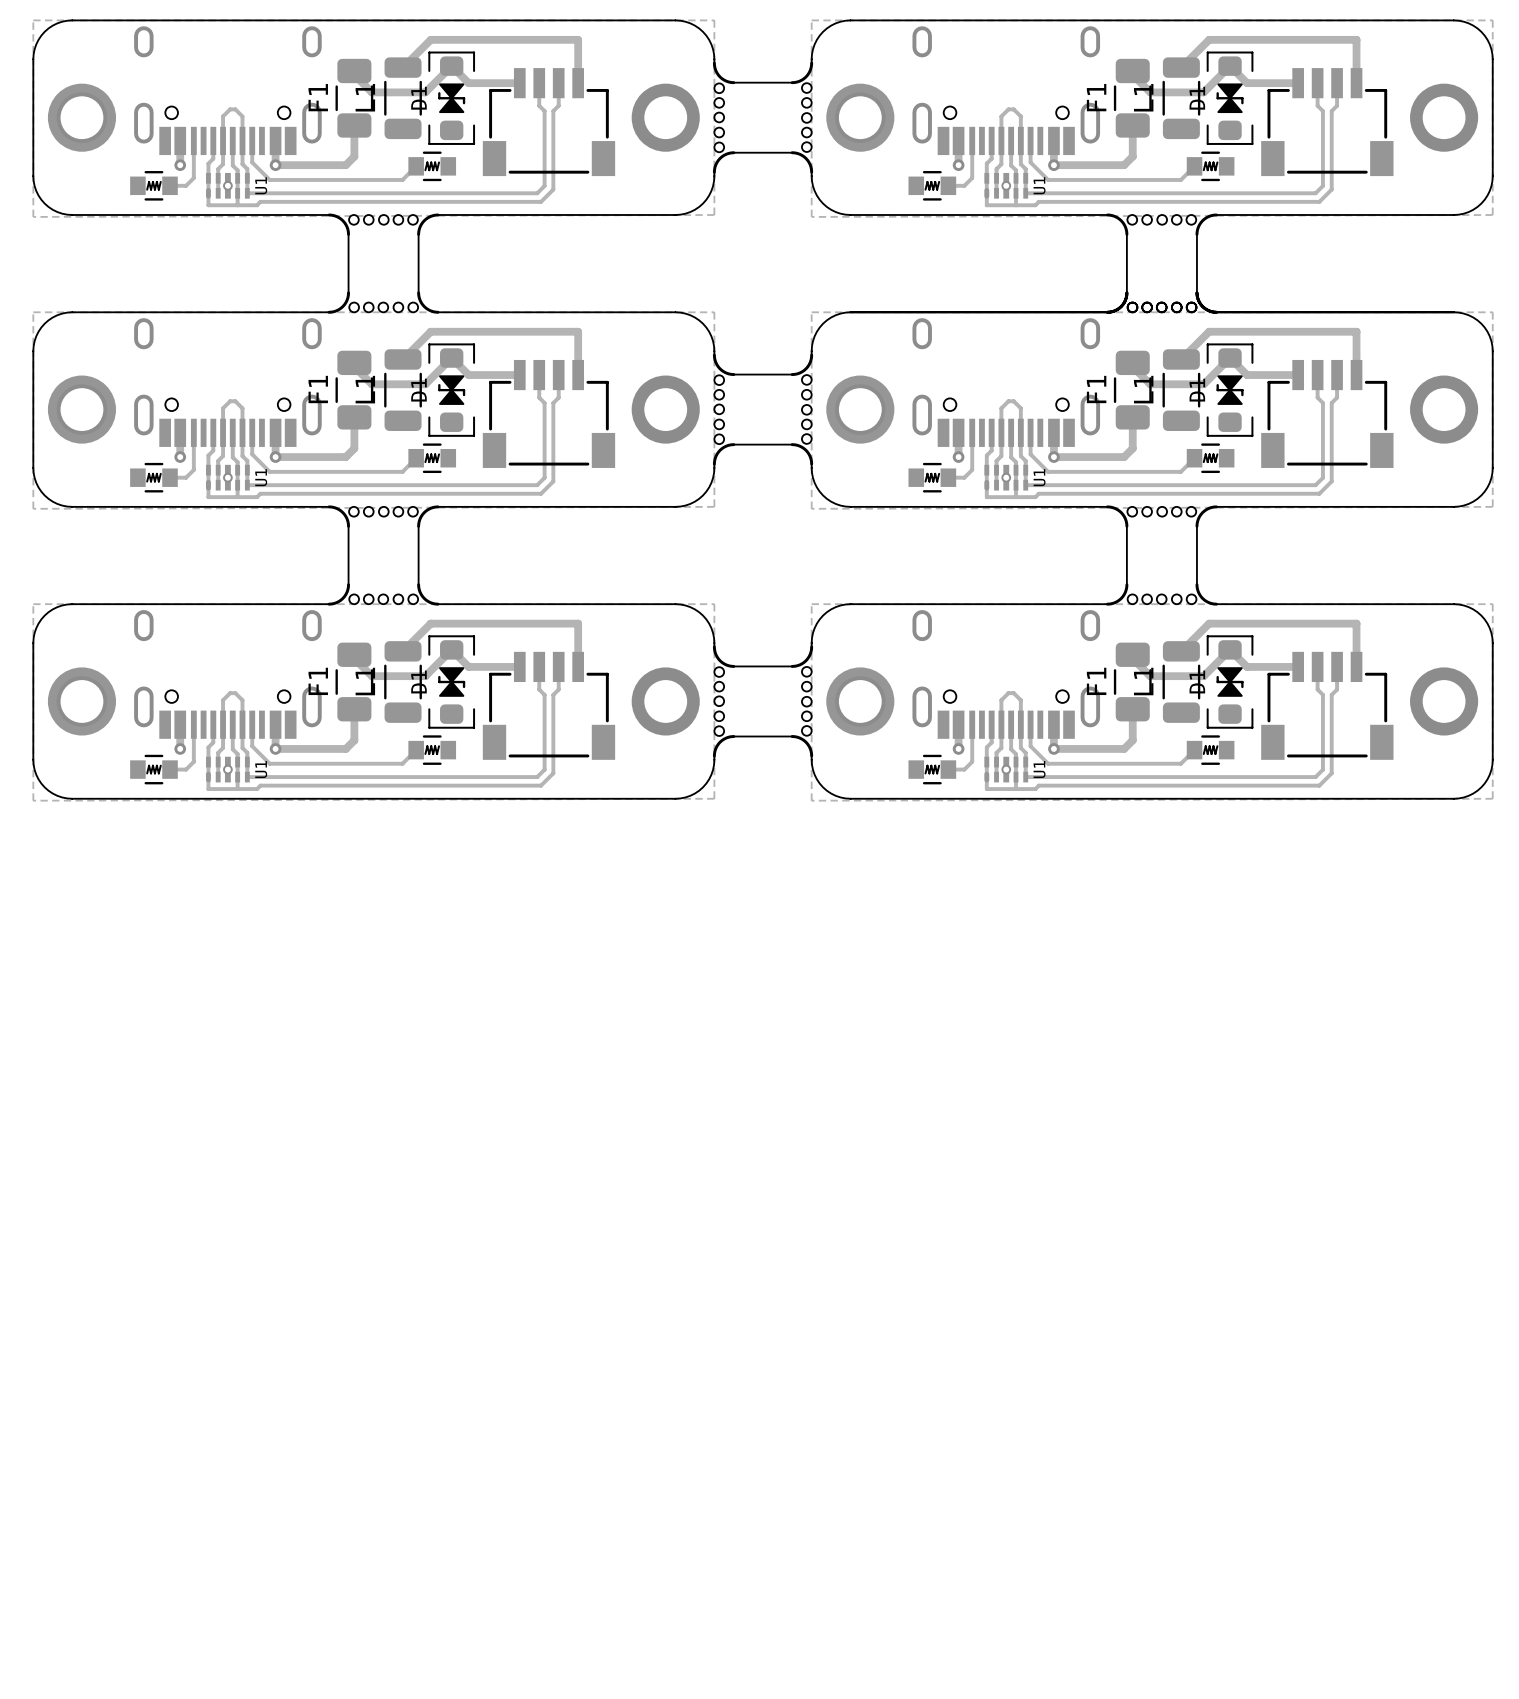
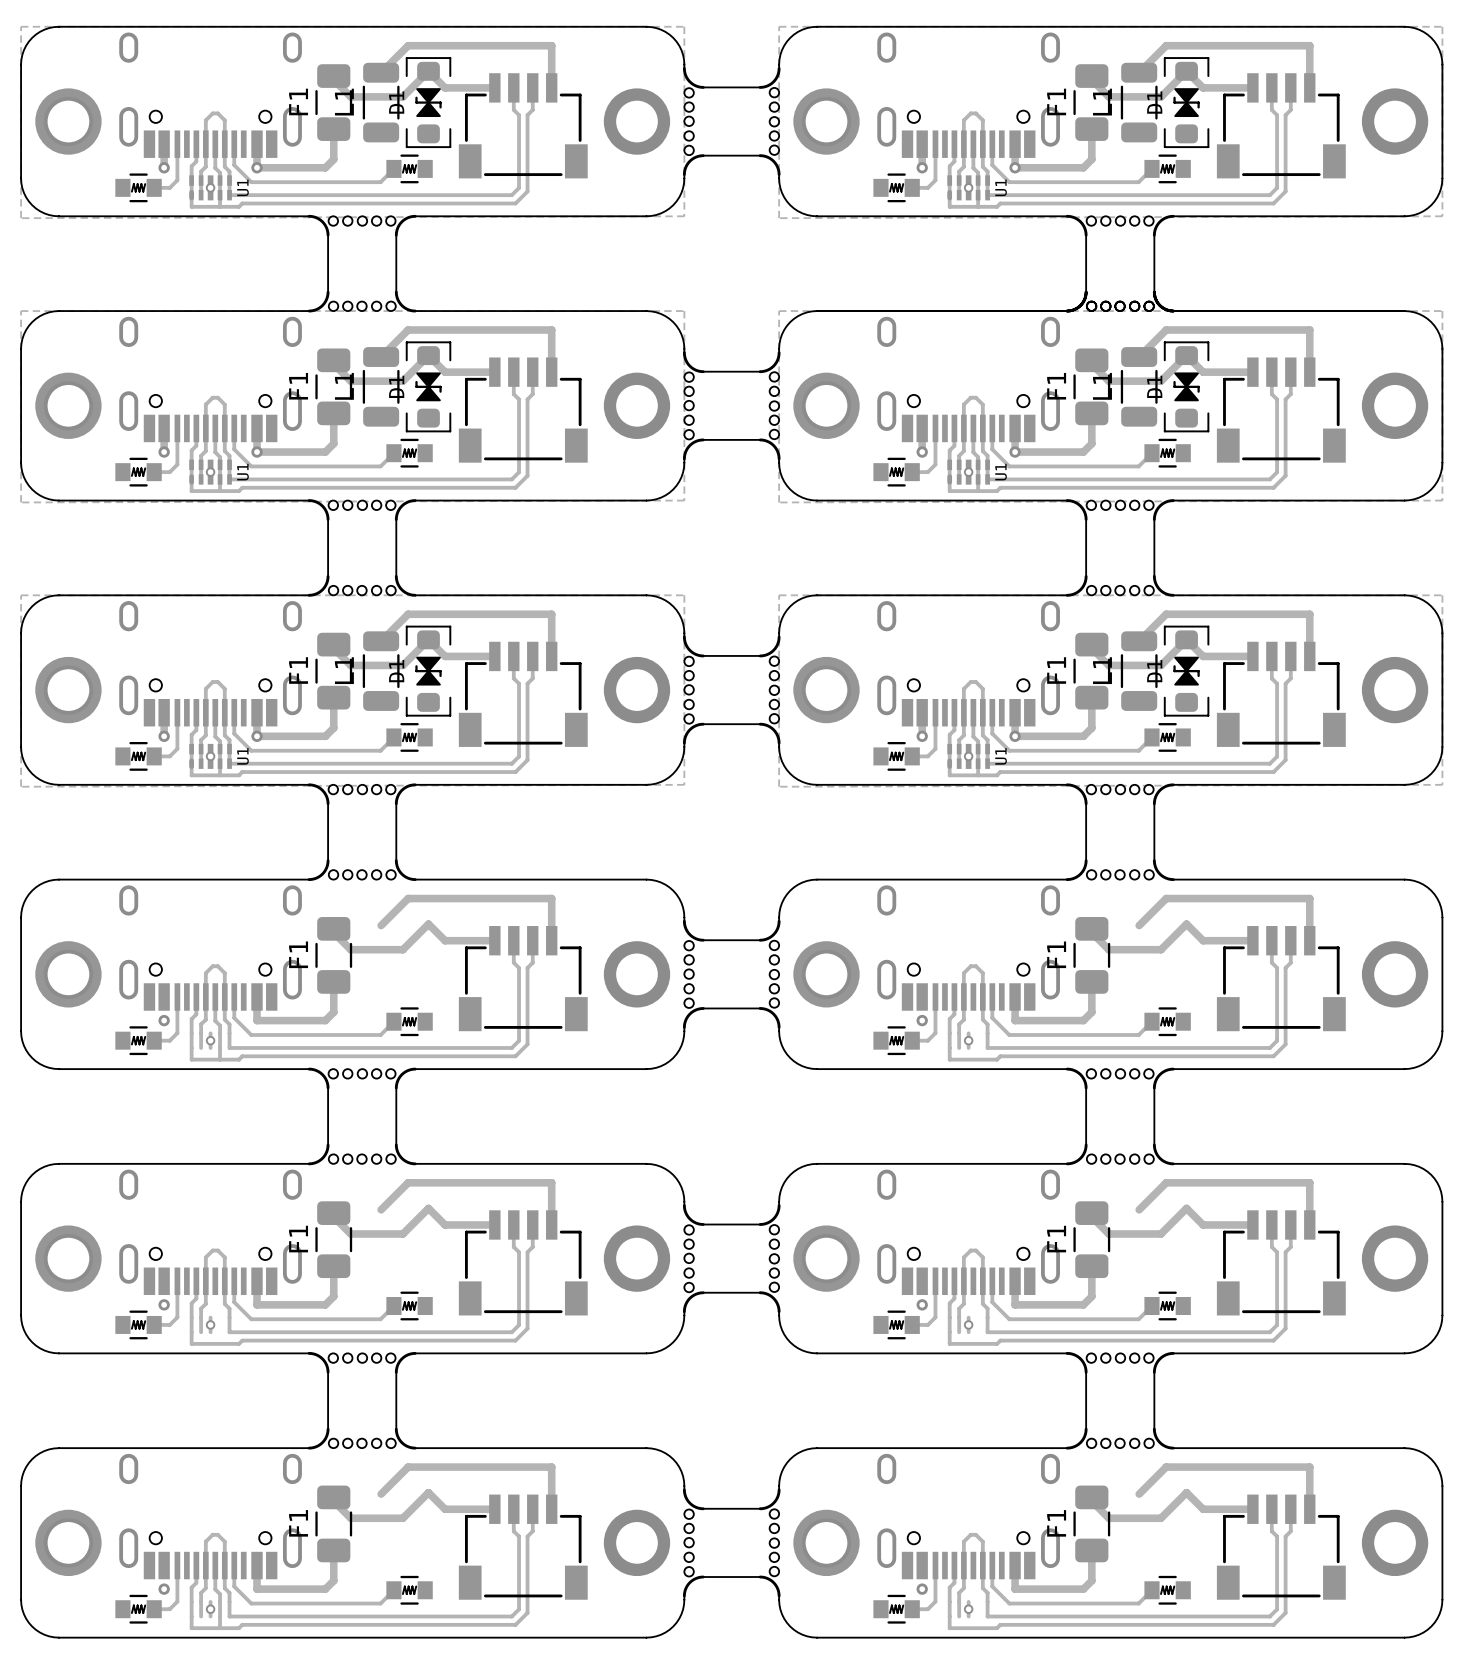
board edge: (329, 798) (438, 798) -> none
board edge: (1107, 798) (1216, 798) -> none
part: none -> (362, 794)
part: none -> (1120, 794)
board edge: none -> (328, 803) (328, 860)
board edge: none -> (396, 803) (396, 860)
board edge: none -> (1086, 803) (1086, 860)
board edge: none -> (1154, 803) (1154, 860)
part: none -> (362, 870)
part: none -> (1120, 870)
board edge: none -> (309, 879) (54, 879) (40, 884) (28, 894) (23, 902) (21, 917) (21, 1036) (26, 1050) (40, 1064) (58, 1069) (309, 1069)
board edge: none -> (415, 879) (651, 879) (665, 884) (676, 894) (683, 907) (684, 921)
board edge: none -> (1067, 879) (812, 879) (798, 884) (786, 894) (780, 907) (779, 921)
board edge: none -> (1173, 879) (1409, 879) (1423, 884) (1431, 890) (1439, 902) (1442, 917) (1442, 1036) (1434, 1054) (1423, 1064) (1404, 1069) (1173, 1069)
track: none -> (381, 925) (408, 898) (551, 898) (551, 940)
track: none -> (1139, 925) (1166, 898) (1309, 898) (1309, 940)
track: none -> (333, 932) (350, 949) (402, 949) (428, 924) (445, 940) (494, 940)
track: none -> (1091, 932) (1108, 949) (1160, 949) (1186, 924) (1203, 940) (1252, 940)
track: none -> (513, 940) (513, 962) (519, 967) (519, 1040) (511, 1047) (229, 1047) (229, 1024) (224, 1019) (224, 973) (217, 966) (212, 966) (205, 973) (205, 1019) (201, 1024) (201, 1047)
track: none -> (532, 940) (532, 962) (527, 967) (527, 1044) (515, 1056) (242, 1056) (239, 1059) (191, 1059) (191, 1019) (196, 1014) (196, 996)
board edge: none -> (703, 940) (760, 940)
track: none -> (1271, 940) (1271, 962) (1277, 967) (1277, 1040) (1269, 1047) (987, 1047) (987, 1024) (982, 1019) (982, 973) (975, 966) (970, 966) (963, 973) (963, 1019) (959, 1024) (959, 1047)
track: none -> (1290, 940) (1290, 962) (1285, 967) (1285, 1044) (1273, 1056) (1000, 1056) (997, 1059) (949, 1059) (949, 1019) (954, 1014) (954, 996)
part: none -> (210, 948)
part: none -> (968, 948)
F1: none -> (333, 955)
F1: none -> (1091, 955)
part: none -> (68, 974)
part: none -> (636, 974)
part: none -> (693, 974)
part: none -> (769, 974)
part: none -> (826, 974)
part: none -> (1395, 974)
track: none -> (333, 978) (333, 1012) (325, 1020) (257, 1020) (257, 996)
part: none -> (523, 978)
track: none -> (1091, 978) (1091, 1012) (1083, 1020) (1015, 1020) (1015, 996)
part: none -> (1281, 978)
track: none -> (177, 996) (177, 1033) (169, 1040) (154, 1040)
track: none -> (215, 996) (215, 1020) (220, 1025) (220, 1059)
track: none -> (234, 996) (234, 1017) (251, 1034) (380, 1034) (393, 1021)
track: none -> (935, 996) (935, 1033) (927, 1040) (912, 1040)
track: none -> (992, 996) (992, 1017) (1009, 1034) (1138, 1034) (1151, 1021)
board edge: none -> (703, 1008) (760, 1008)
via: none -> (164, 1020)
via: none -> (922, 1020)
part: none -> (409, 1021)
part: none -> (1167, 1021)
board edge: none -> (684, 1027) (683, 1041) (676, 1054) (665, 1064) (651, 1068) (415, 1069)
board edge: none -> (779, 1027) (780, 1041) (786, 1054) (798, 1064) (812, 1068) (1067, 1069)
track: none -> (210, 1033) (210, 1047)
track: none -> (968, 1033) (968, 1047)
part: none -> (138, 1040)
via: none -> (210, 1040)
part: none -> (896, 1040)
via: none -> (968, 1040)
part: none -> (362, 1078)
part: none -> (1120, 1078)
board edge: none -> (328, 1088) (328, 1144)
board edge: none -> (396, 1088) (396, 1144)
board edge: none -> (1086, 1088) (1086, 1144)
board edge: none -> (1154, 1088) (1154, 1144)
part: none -> (362, 1154)
part: none -> (1120, 1154)
board edge: none -> (309, 1163) (54, 1164) (40, 1168) (28, 1178) (23, 1187) (21, 1201) (21, 1320) (26, 1334) (40, 1348) (58, 1353) (309, 1353)
board edge: none -> (415, 1163) (651, 1164) (665, 1168) (676, 1178) (683, 1191) (684, 1205)
board edge: none -> (1067, 1163) (812, 1164) (798, 1168) (786, 1178) (780, 1191) (779, 1205)
board edge: none -> (1173, 1163) (1409, 1164) (1423, 1168) (1431, 1174) (1439, 1187) (1442, 1201) (1442, 1320) (1434, 1338) (1423, 1348) (1404, 1353) (1173, 1353)
track: none -> (381, 1209) (408, 1182) (551, 1182) (551, 1224)
track: none -> (1139, 1209) (1166, 1182) (1309, 1182) (1309, 1224)
track: none -> (333, 1216) (350, 1233) (402, 1233) (428, 1208) (445, 1224) (494, 1224)
track: none -> (1091, 1216) (1108, 1233) (1160, 1233) (1186, 1208) (1203, 1224) (1252, 1224)
track: none -> (513, 1224) (513, 1247) (519, 1252) (519, 1325) (511, 1332) (229, 1332) (229, 1308) (224, 1303) (224, 1257) (217, 1250) (212, 1250) (205, 1257) (205, 1303) (201, 1308) (201, 1332)
track: none -> (532, 1224) (532, 1247) (527, 1252) (527, 1328) (515, 1340) (242, 1340) (239, 1343) (191, 1343) (191, 1303) (196, 1298) (196, 1281)
board edge: none -> (703, 1224) (760, 1224)
track: none -> (1271, 1224) (1271, 1247) (1277, 1252) (1277, 1325) (1269, 1332) (987, 1332) (987, 1308) (982, 1303) (982, 1257) (975, 1250) (970, 1250) (963, 1257) (963, 1303) (959, 1308) (959, 1332)
track: none -> (1290, 1224) (1290, 1247) (1285, 1252) (1285, 1328) (1273, 1340) (1000, 1340) (997, 1343) (949, 1343) (949, 1303) (954, 1298) (954, 1281)
part: none -> (210, 1232)
part: none -> (968, 1232)
F1: none -> (333, 1239)
F1: none -> (1091, 1239)
part: none -> (68, 1258)
part: none -> (636, 1258)
part: none -> (693, 1258)
part: none -> (769, 1258)
part: none -> (826, 1258)
part: none -> (1395, 1258)
track: none -> (333, 1262) (333, 1296) (325, 1304) (257, 1304) (257, 1281)
part: none -> (523, 1262)
track: none -> (1091, 1262) (1091, 1296) (1083, 1304) (1015, 1304) (1015, 1281)
part: none -> (1281, 1262)
track: none -> (177, 1281) (177, 1317) (169, 1324) (154, 1324)
track: none -> (234, 1281) (234, 1302) (251, 1319) (380, 1319) (393, 1306)
track: none -> (935, 1281) (935, 1317) (927, 1324) (912, 1324)
track: none -> (992, 1281) (992, 1302) (1009, 1319) (1138, 1319) (1151, 1306)
board edge: none -> (703, 1292) (760, 1292)
via: none -> (164, 1304)
via: none -> (922, 1304)
part: none -> (409, 1306)
part: none -> (1167, 1306)
board edge: none -> (684, 1311) (683, 1325) (676, 1338) (665, 1348) (651, 1353) (415, 1353)
board edge: none -> (779, 1311) (780, 1325) (786, 1338) (798, 1348) (812, 1353) (1067, 1353)
track: none -> (210, 1317) (210, 1332)
track: none -> (968, 1317) (968, 1332)
part: none -> (138, 1324)
via: none -> (210, 1324)
part: none -> (896, 1324)
via: none -> (968, 1324)
part: none -> (362, 1362)
part: none -> (1120, 1362)
board edge: none -> (328, 1372) (328, 1429)
board edge: none -> (396, 1372) (396, 1429)
board edge: none -> (1086, 1372) (1086, 1429)
board edge: none -> (1154, 1372) (1154, 1429)
part: none -> (362, 1438)
part: none -> (1120, 1438)
board edge: none -> (309, 1448) (58, 1448) (40, 1453) (26, 1467) (21, 1481) (21, 1599) (26, 1618) (40, 1632) (58, 1637) (646, 1637) (660, 1634) (673, 1626) (681, 1614) (684, 1595)
board edge: none -> (415, 1448) (651, 1448) (665, 1453) (676, 1462) (683, 1476) (684, 1489)
board edge: none -> (1067, 1448) (812, 1448) (798, 1453) (786, 1462) (780, 1476) (779, 1489)
board edge: none -> (1173, 1448) (1404, 1448) (1423, 1453) (1434, 1462) (1442, 1481) (1442, 1599) (1437, 1618) (1423, 1632) (1404, 1637) (817, 1637) (802, 1634) (790, 1626) (782, 1614) (779, 1595)
track: none -> (381, 1494) (408, 1467) (551, 1467) (551, 1509)
track: none -> (1139, 1494) (1166, 1467) (1309, 1467) (1309, 1509)
track: none -> (333, 1501) (350, 1518) (402, 1518) (428, 1492) (445, 1509) (494, 1509)
track: none -> (1091, 1501) (1108, 1518) (1160, 1518) (1186, 1492) (1203, 1509) (1252, 1509)
track: none -> (513, 1509) (513, 1531) (519, 1536) (519, 1609) (511, 1616) (229, 1616) (229, 1592) (224, 1588) (224, 1541) (217, 1534) (212, 1534) (205, 1541) (205, 1588) (201, 1592) (201, 1616)
track: none -> (532, 1509) (532, 1531) (527, 1536) (527, 1612) (515, 1624) (242, 1624) (239, 1628) (191, 1628) (191, 1587) (196, 1582) (196, 1565)
board edge: none -> (703, 1508) (760, 1508)
track: none -> (1271, 1509) (1271, 1531) (1277, 1536) (1277, 1609) (1269, 1616) (987, 1616) (987, 1592) (982, 1588) (982, 1541) (975, 1534) (970, 1534) (963, 1541) (963, 1588) (959, 1592) (959, 1616)
track: none -> (1290, 1509) (1290, 1531) (1285, 1536) (1285, 1612) (1273, 1624) (1000, 1624) (997, 1628) (949, 1628) (949, 1587) (954, 1582) (954, 1565)
part: none -> (210, 1516)
part: none -> (968, 1516)
F1: none -> (333, 1523)
F1: none -> (1091, 1523)
part: none -> (68, 1542)
part: none -> (636, 1542)
part: none -> (693, 1542)
part: none -> (769, 1542)
part: none -> (826, 1542)
part: none -> (1395, 1542)
track: none -> (333, 1546) (333, 1580) (325, 1589) (257, 1589) (257, 1565)
part: none -> (523, 1547)
track: none -> (1091, 1546) (1091, 1580) (1083, 1589) (1015, 1589) (1015, 1565)
part: none -> (1281, 1547)
track: none -> (177, 1565) (177, 1601) (169, 1609) (154, 1609)
track: none -> (215, 1565) (215, 1589) (220, 1594) (220, 1628)
track: none -> (234, 1565) (234, 1586) (251, 1603) (380, 1603) (393, 1590)
track: none -> (935, 1565) (935, 1601) (927, 1609) (912, 1609)
track: none -> (992, 1565) (992, 1586) (1009, 1603) (1138, 1603) (1151, 1590)
board edge: none -> (703, 1577) (760, 1577)
via: none -> (164, 1589)
via: none -> (922, 1589)
part: none -> (409, 1590)
part: none -> (1167, 1590)
track: none -> (210, 1601) (210, 1616)
track: none -> (968, 1601) (968, 1616)
part: none -> (138, 1609)
via: none -> (210, 1609)
part: none -> (896, 1609)
via: none -> (968, 1609)

